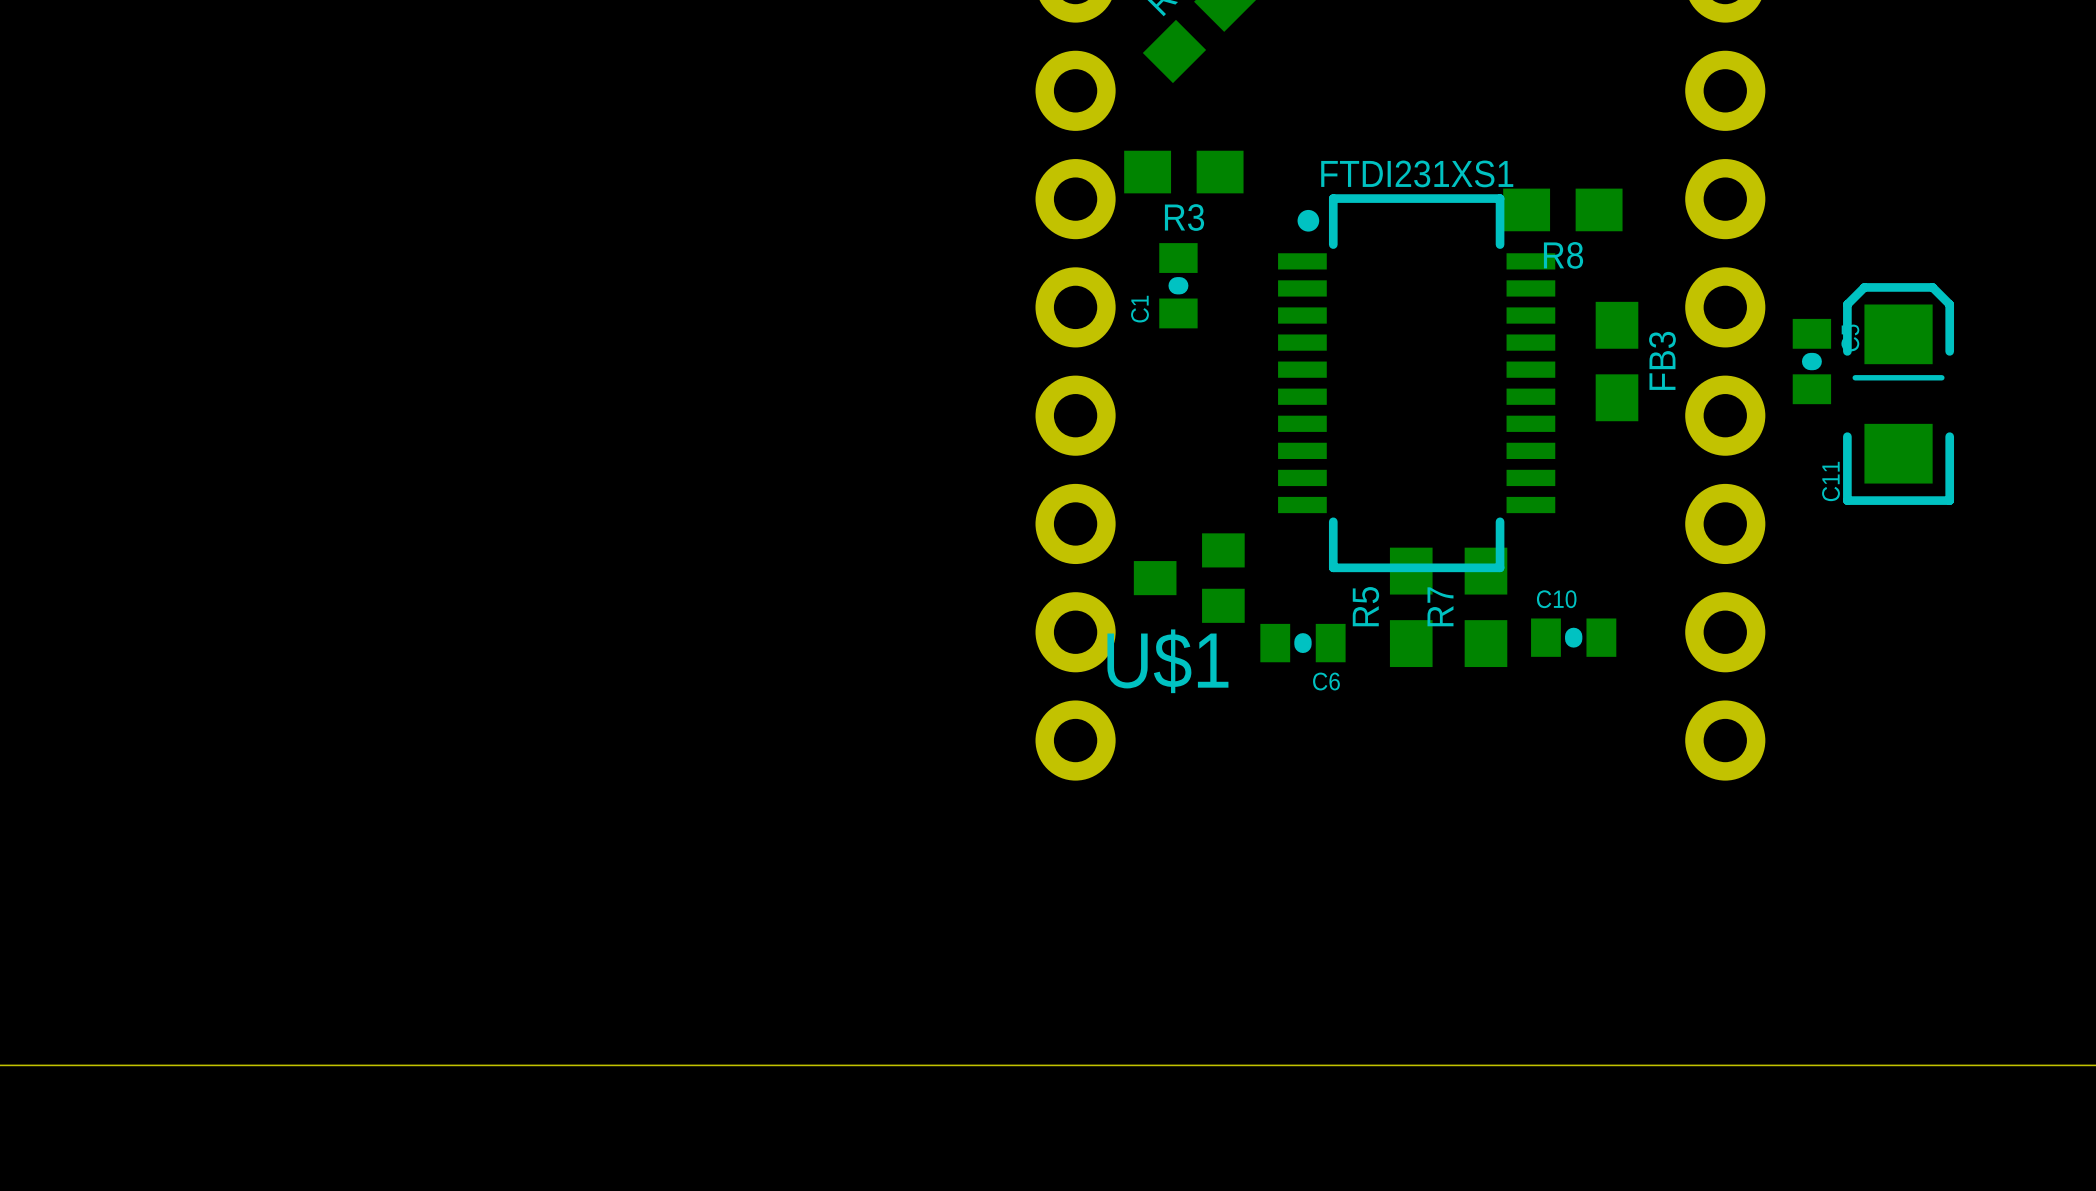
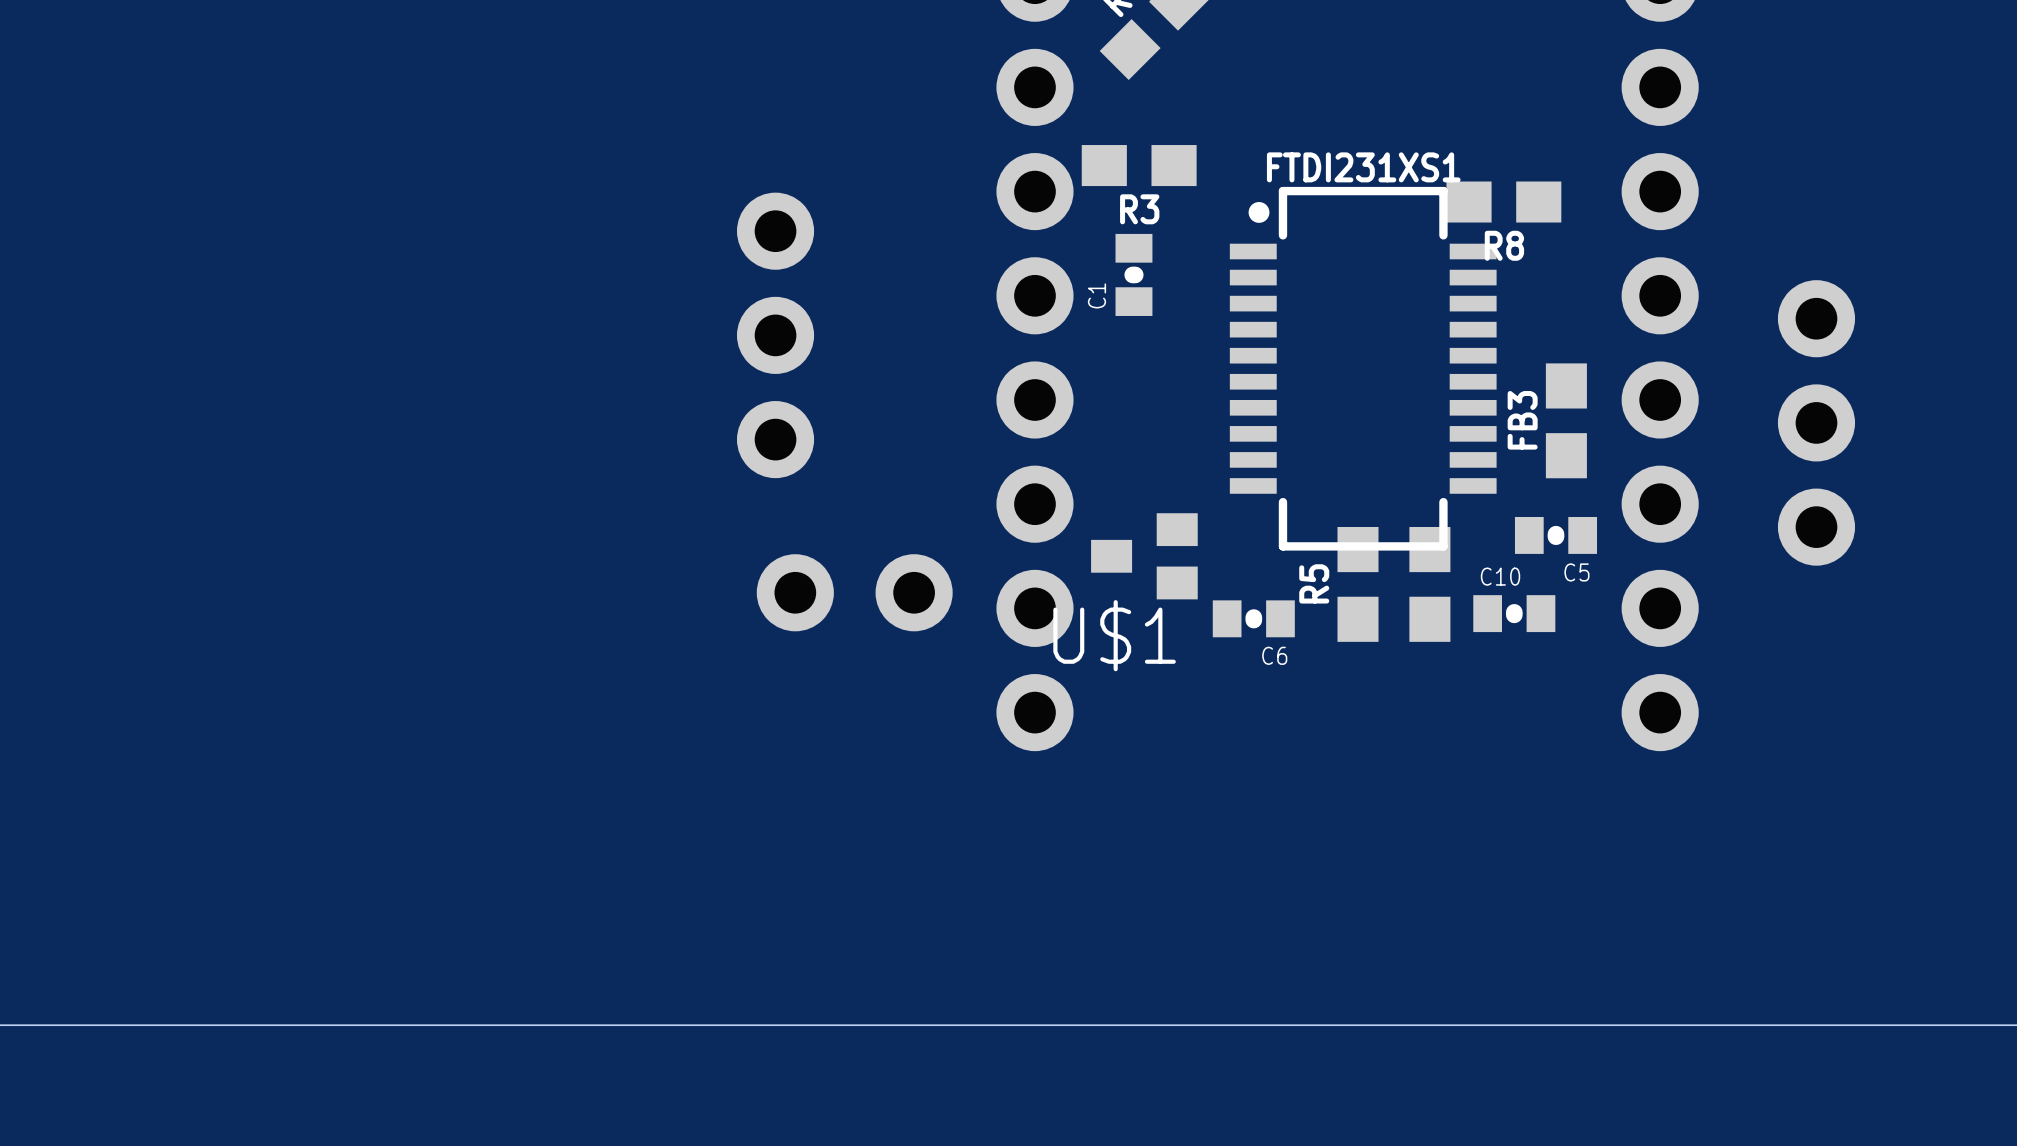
part: none -> (775, 335)
FB3 name position: FB3 (1662, 360) -> FB3 (1522, 420)
FB3 position: (1616, 361) -> (1566, 420)
C5 rotation: 0° (1811, 361) -> 90° clockwise (1555, 535)
C5 position: (1811, 361) -> (1555, 535)
C11: (1898, 394) -> none
part: none -> (1816, 422)
R7 name: R7 (1440, 606) -> none
part: none -> (854, 592)

